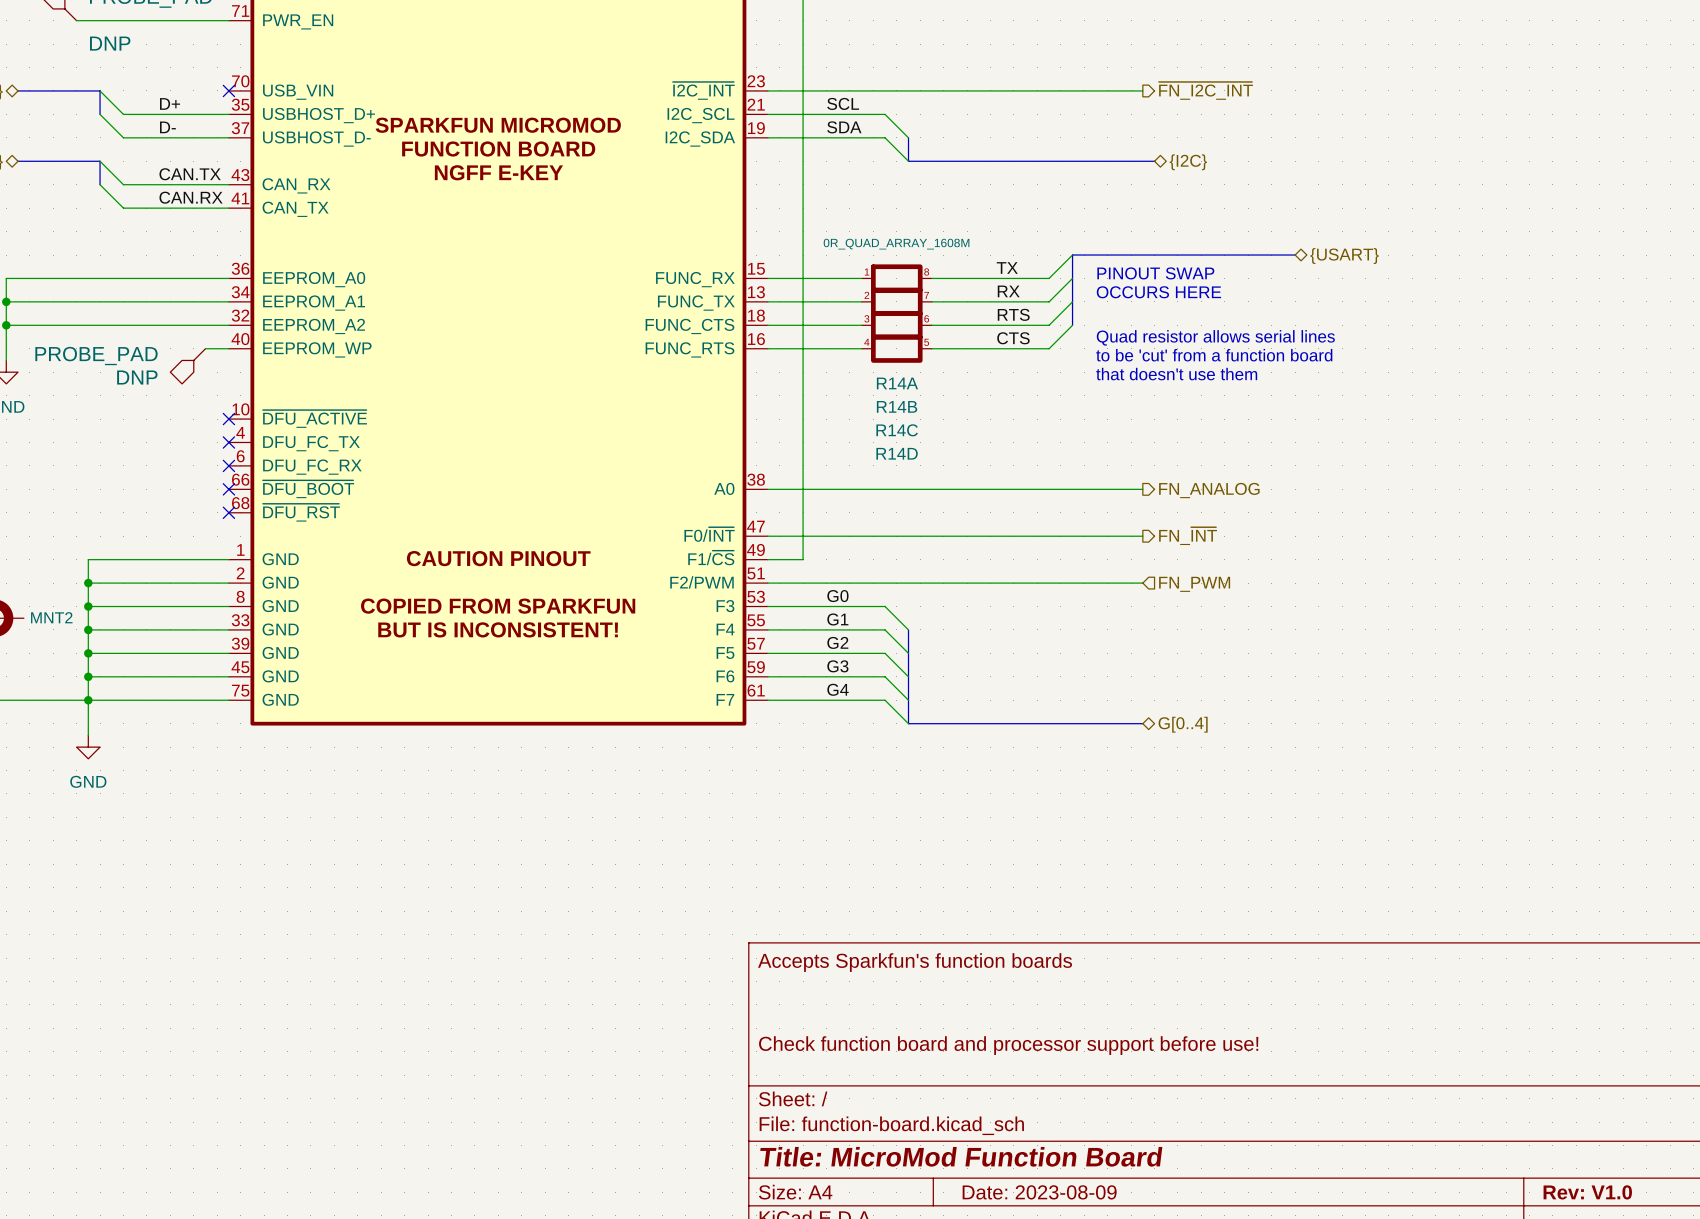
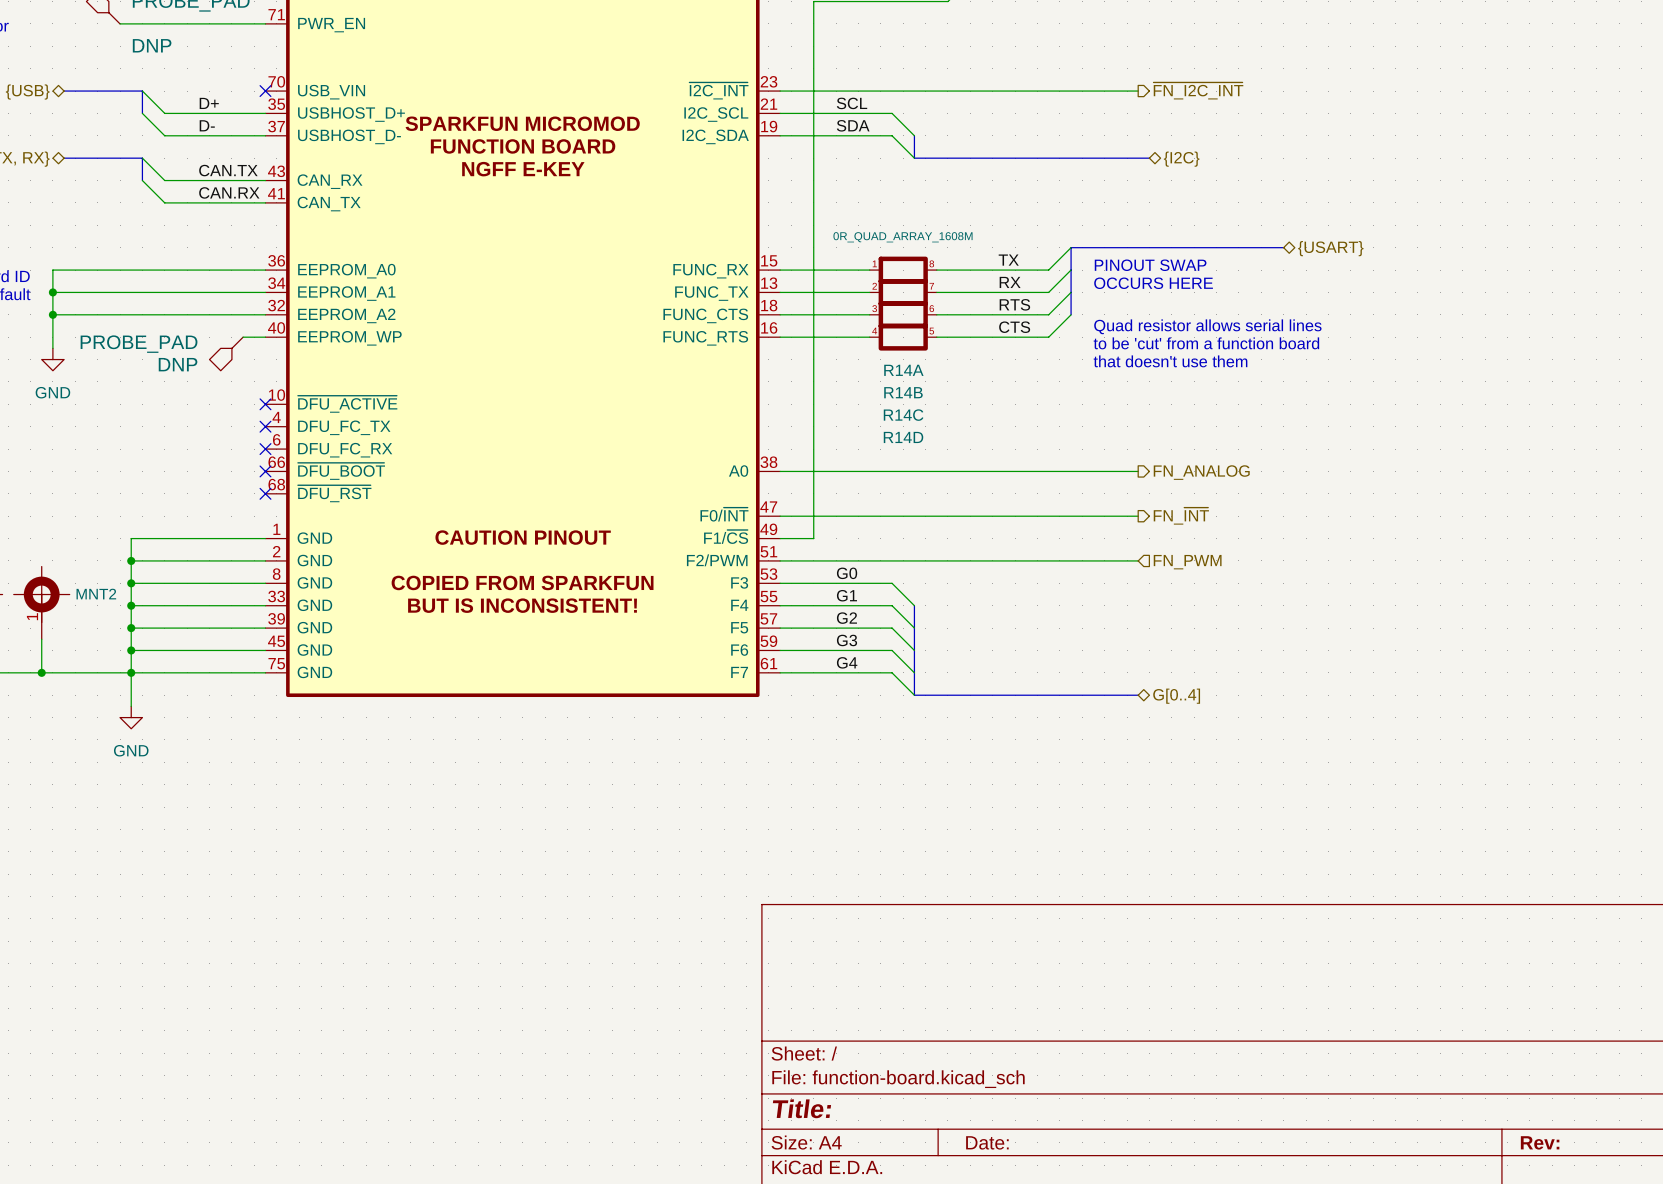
title block: Accepts Sparkfun's function boards (915, 962) -> none
title block: Check function board and processor support before use! (1008, 1045) -> none
title block: Title: MicroMod Function Board (961, 1156) -> Title: (801, 1108)
title block: Date: 2023-08-09 (1039, 1192) -> Date: (987, 1142)
title block: Rev: V1.0 (1587, 1192) -> Rev: (1540, 1142)

